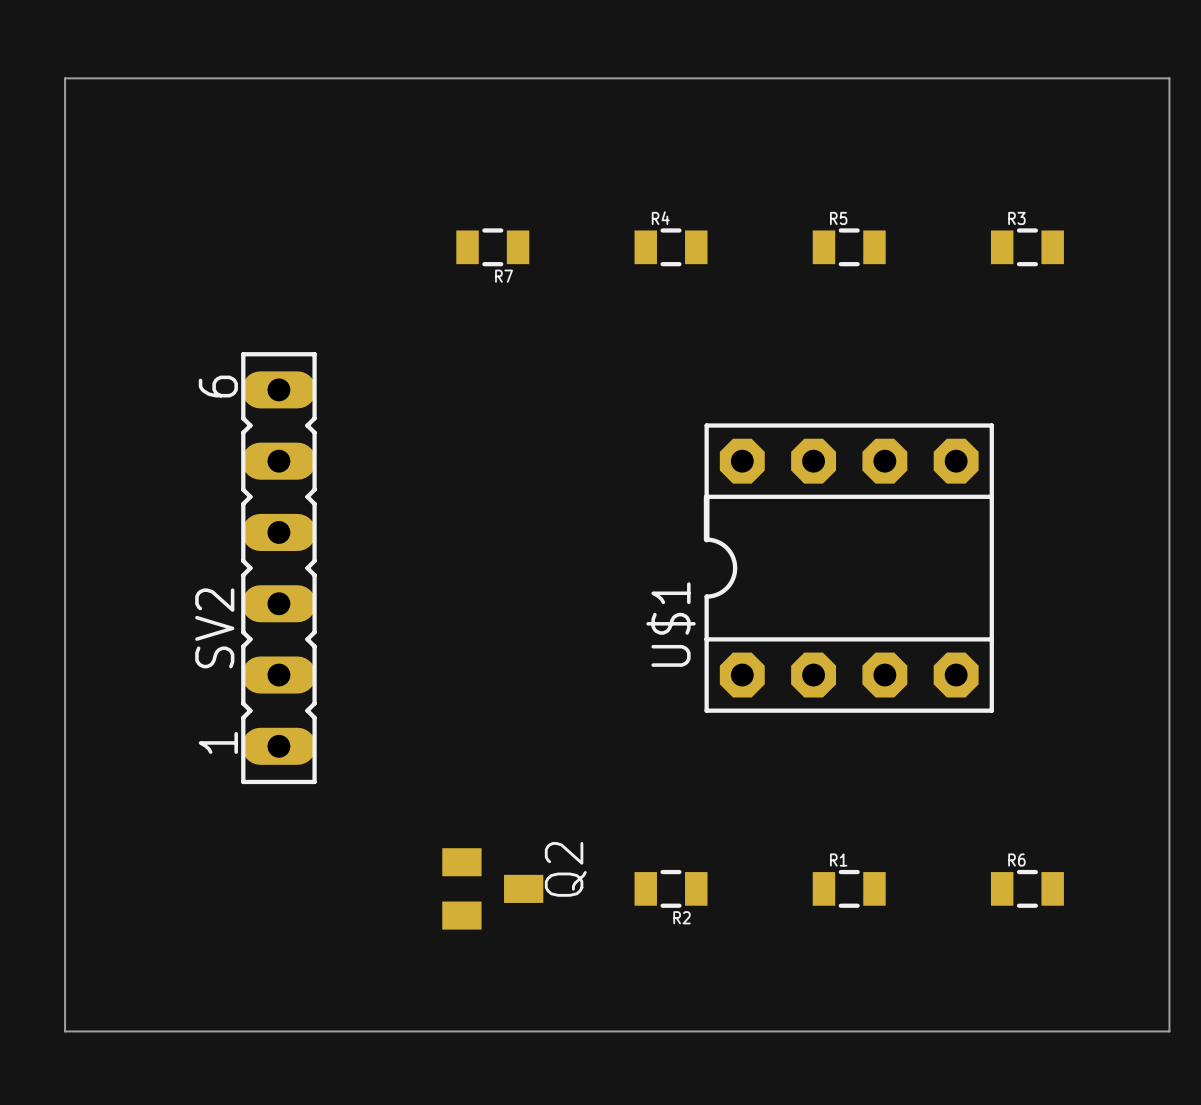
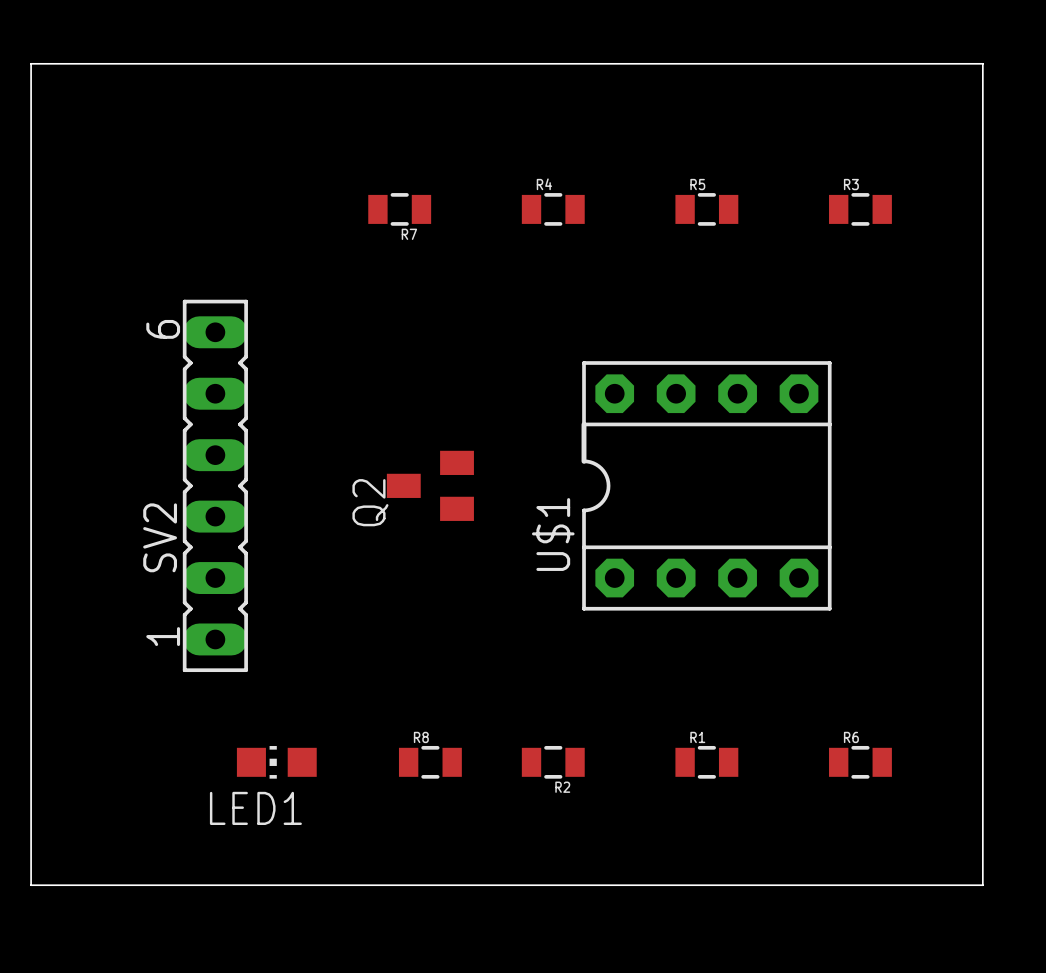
LED1: none -> (276, 762)
Q2 rotation: 0° (492, 888) -> 180° (430, 485)
Q2 position: (492, 888) -> (430, 485)
R8: none -> (430, 762)

